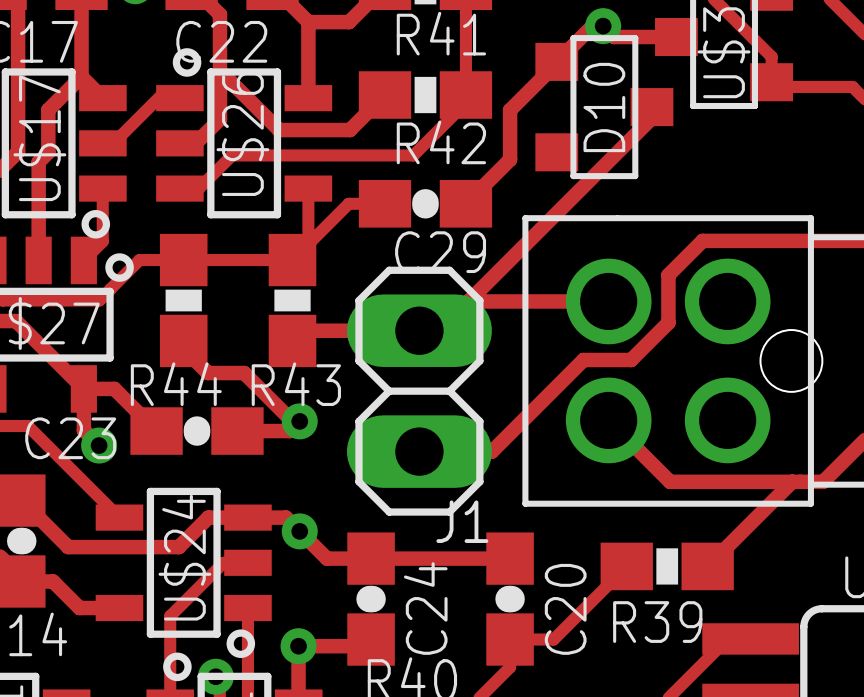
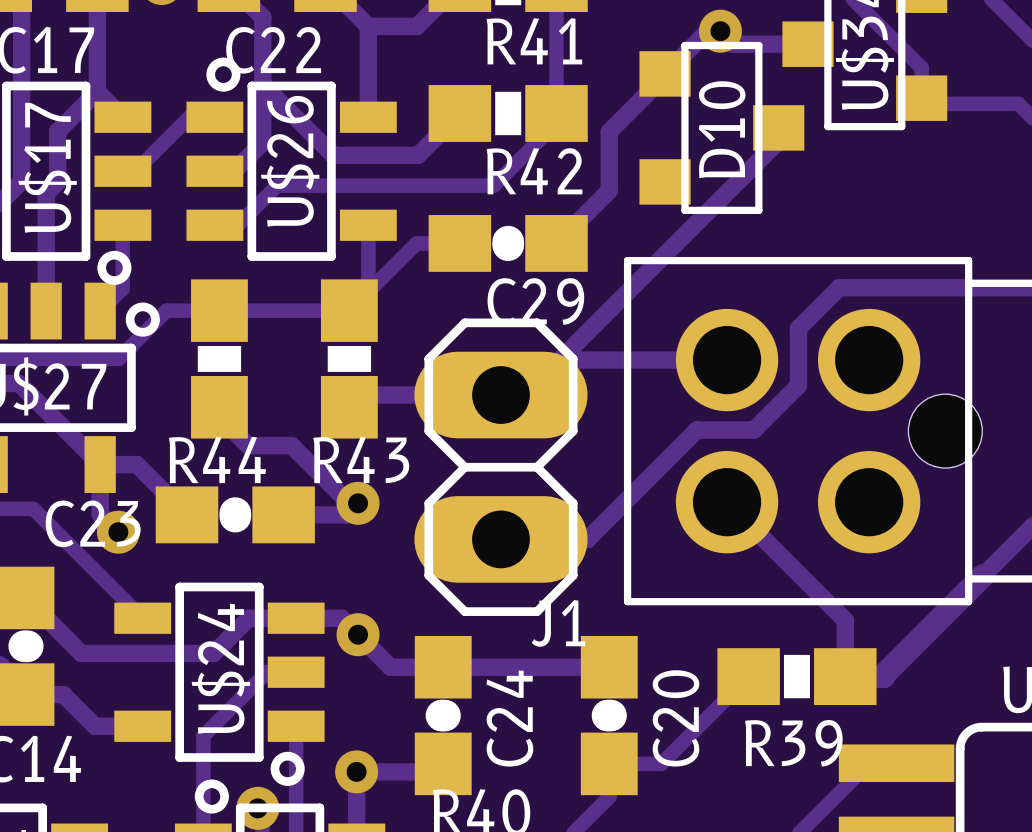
track: (670, 481) (823, 481) -> (800, 575) (845, 620) (845, 676) (883, 676) (983, 575)
track: (792, 481) (707, 566) -> none

